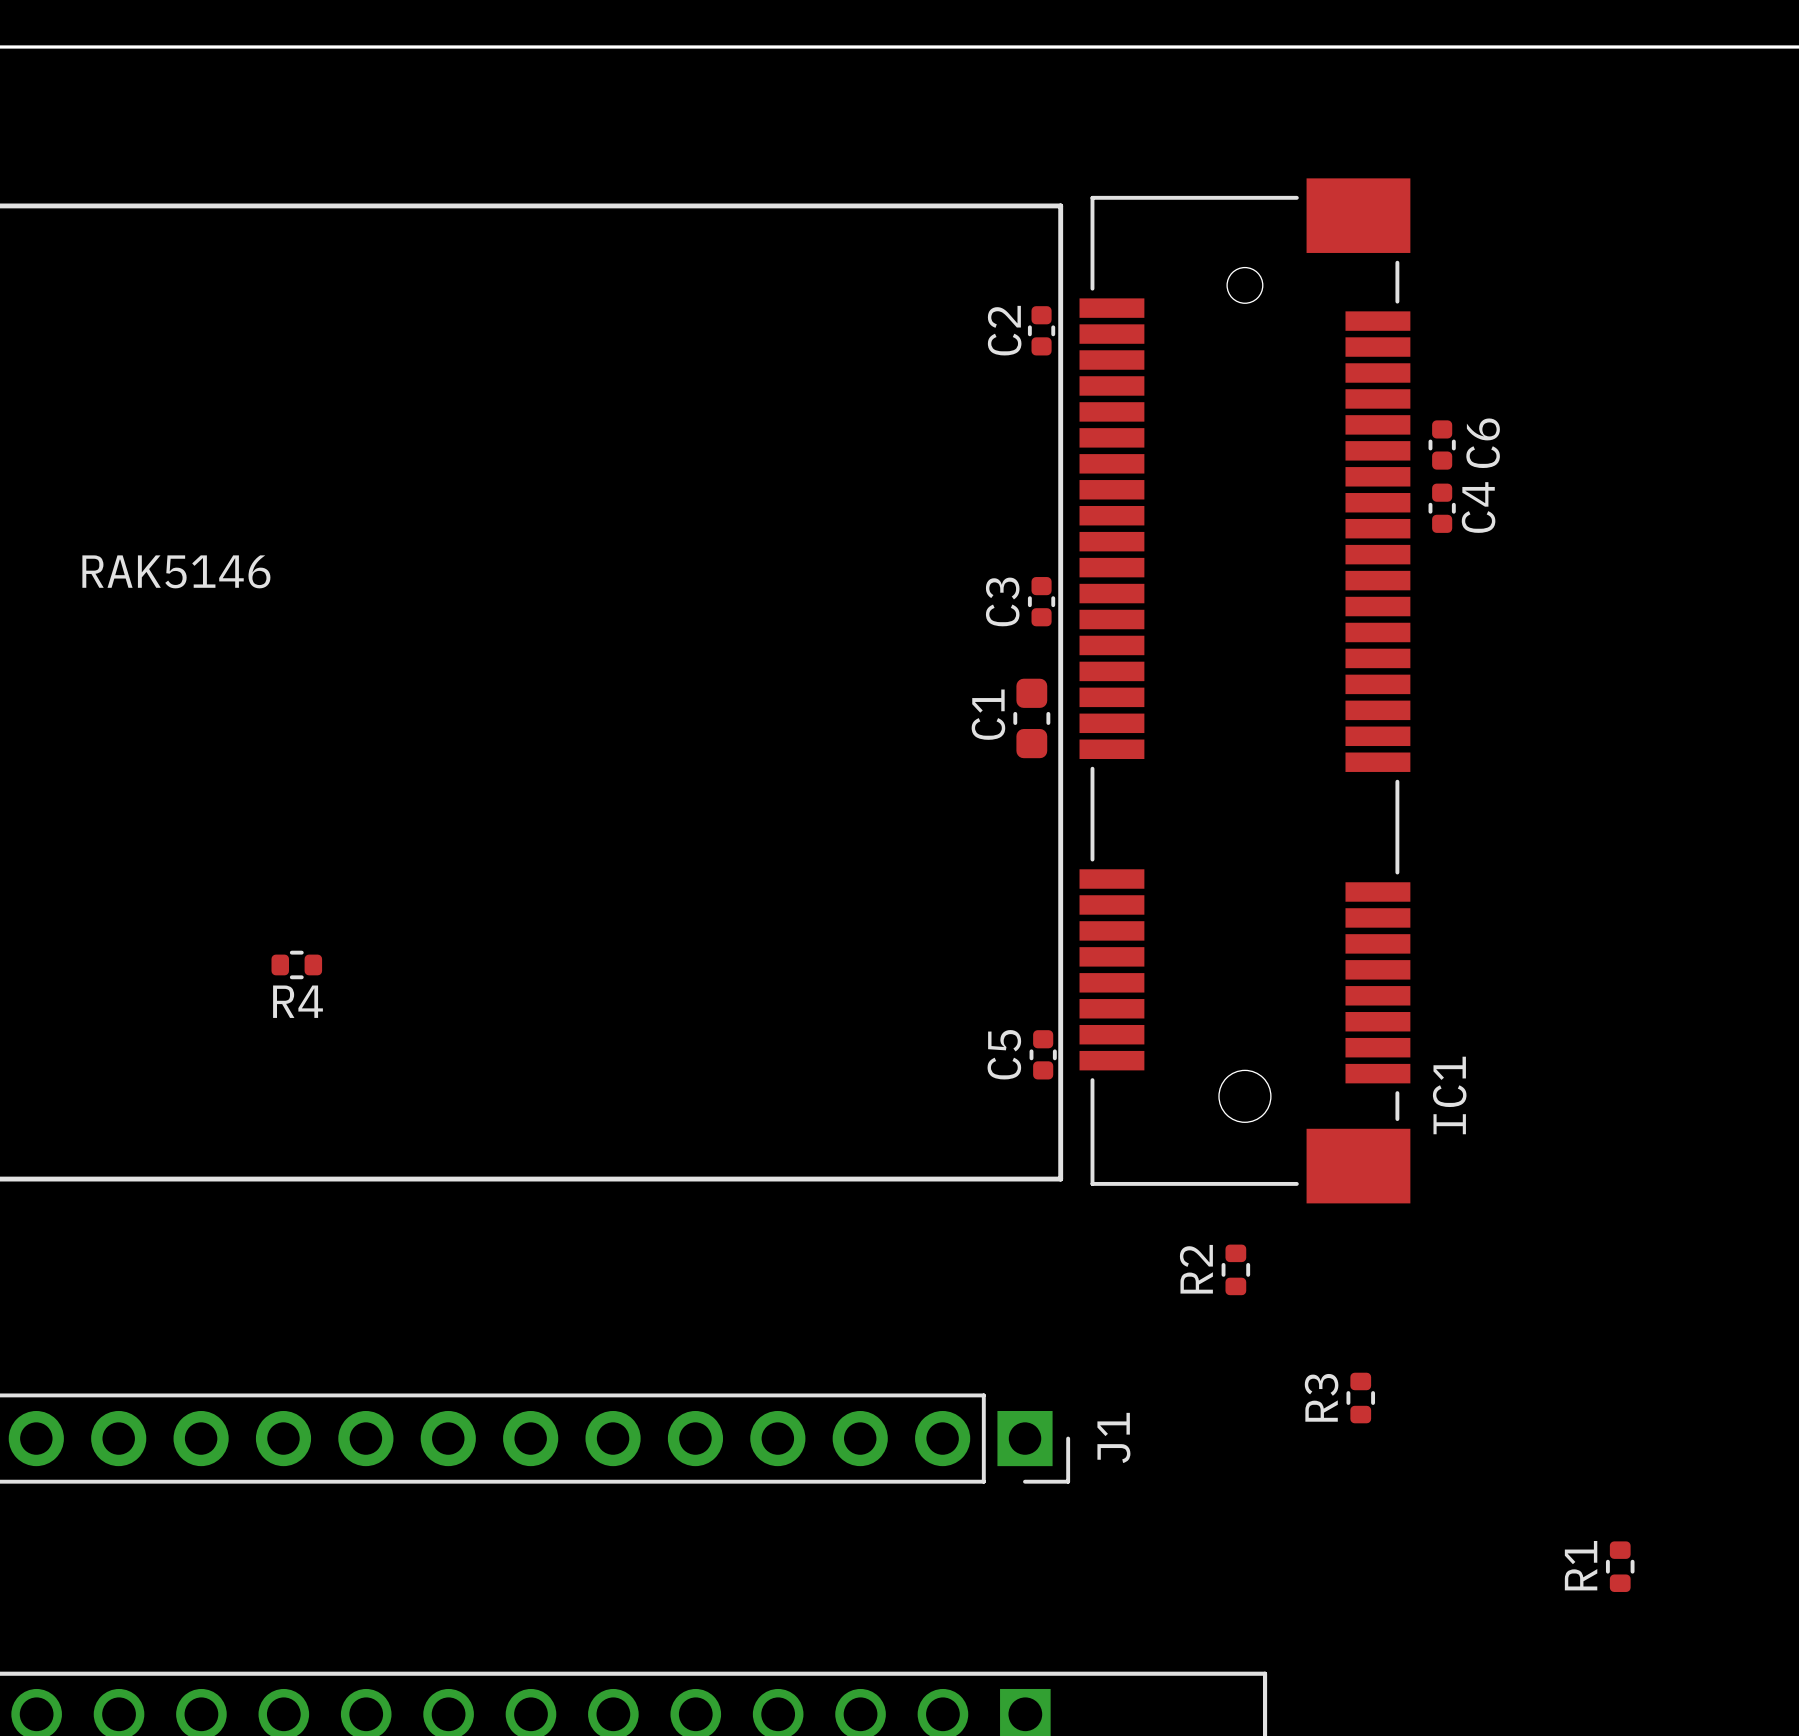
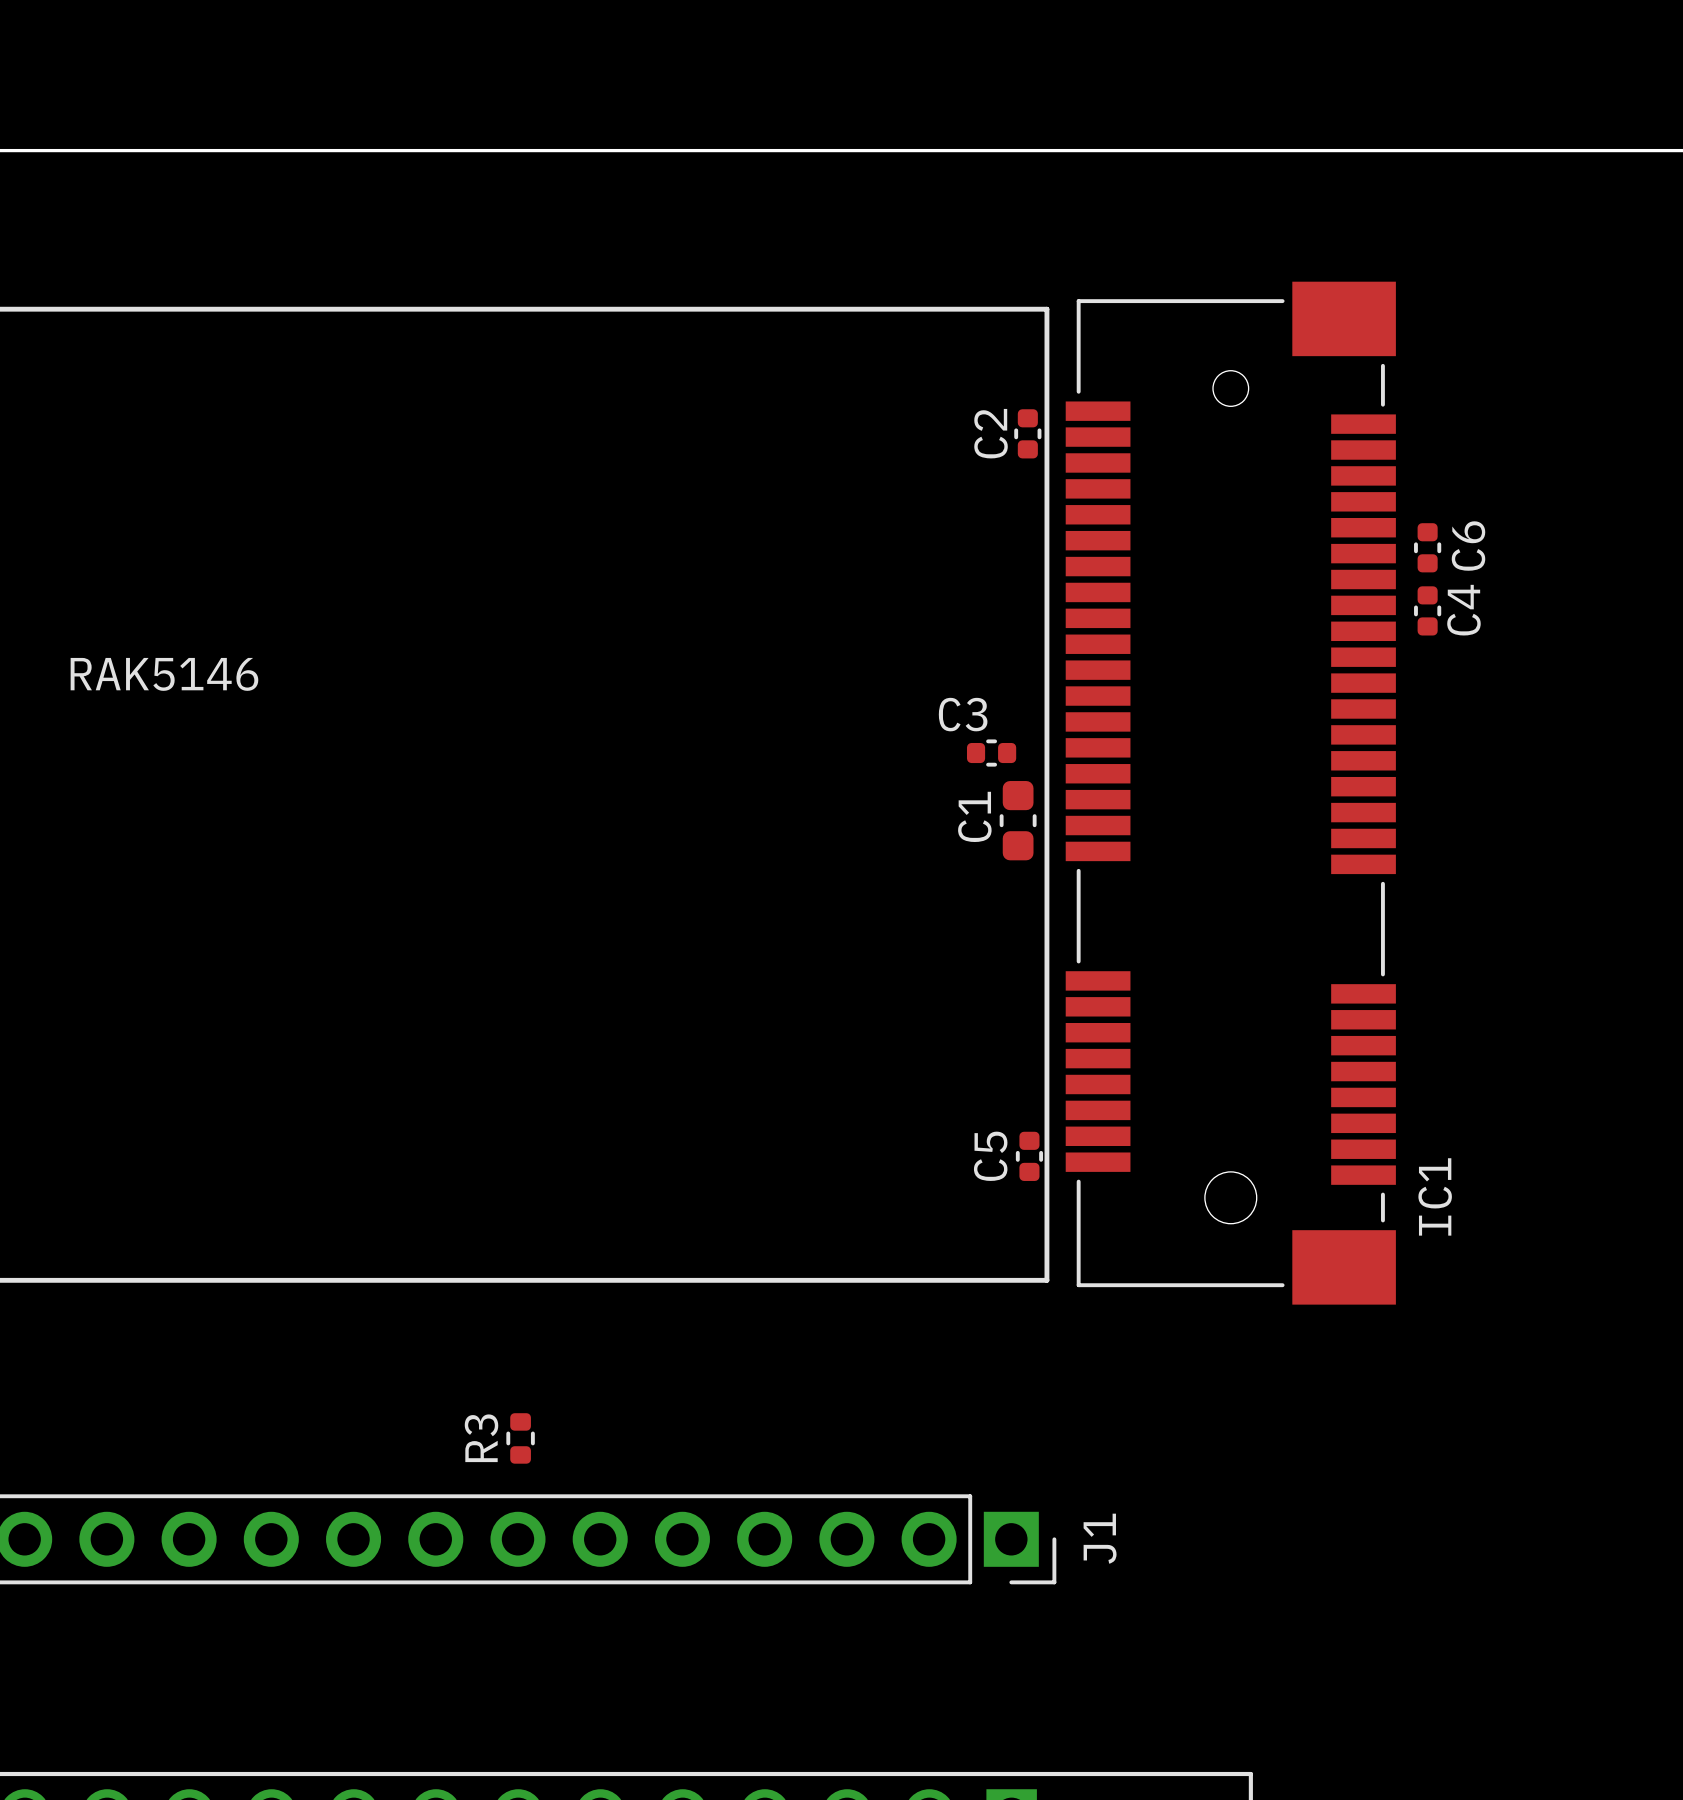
C3 rotation: 0° (1041, 601) -> 90° clockwise (991, 753)
C3 position: (1041, 601) -> (991, 753)
R4: (296, 964) -> none
R2: (1235, 1269) -> none
R3 position: (1360, 1398) -> (520, 1438)
R1: (1620, 1566) -> none

